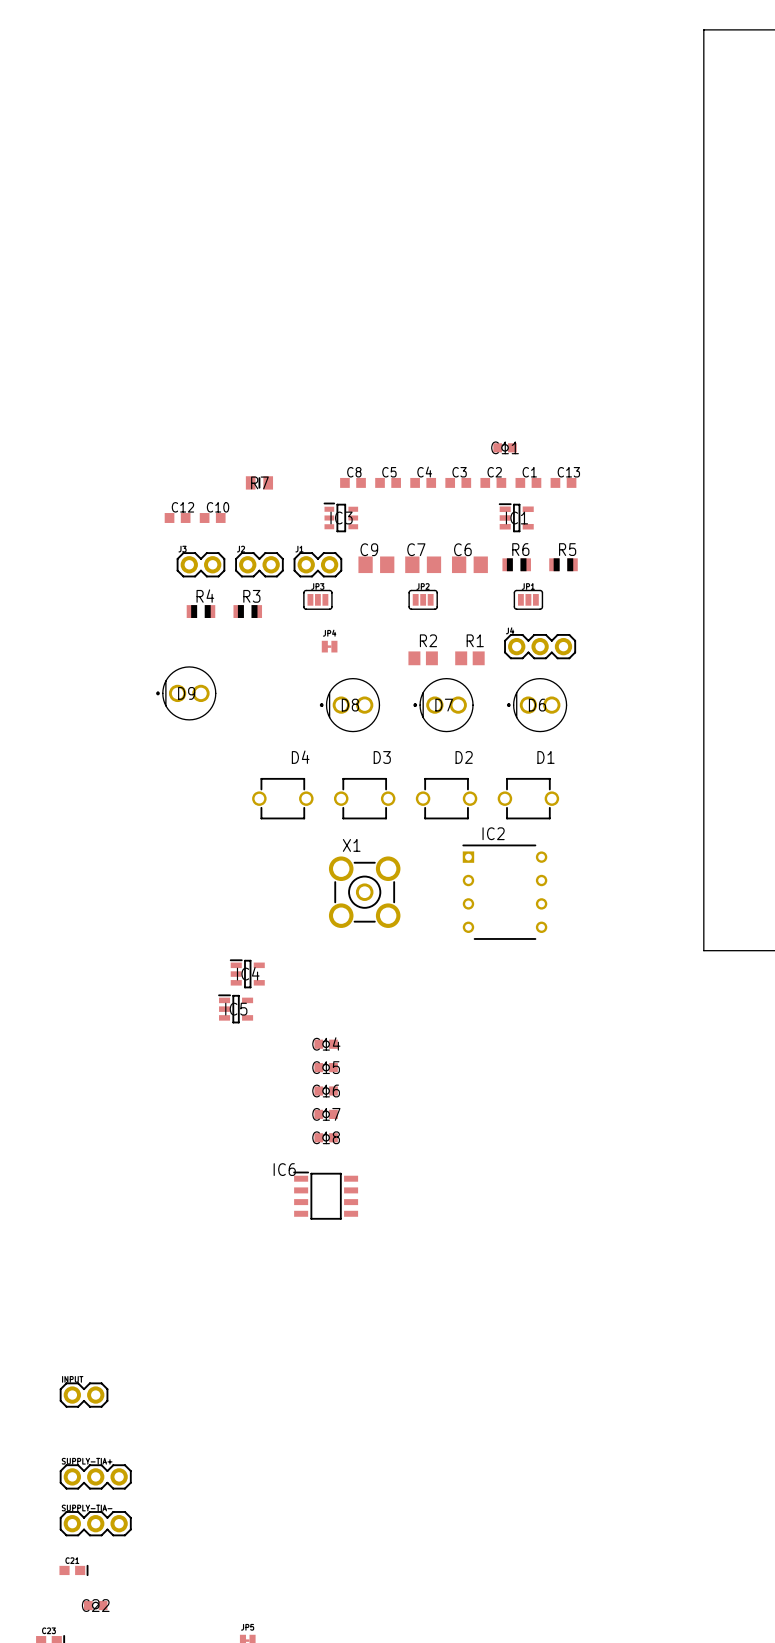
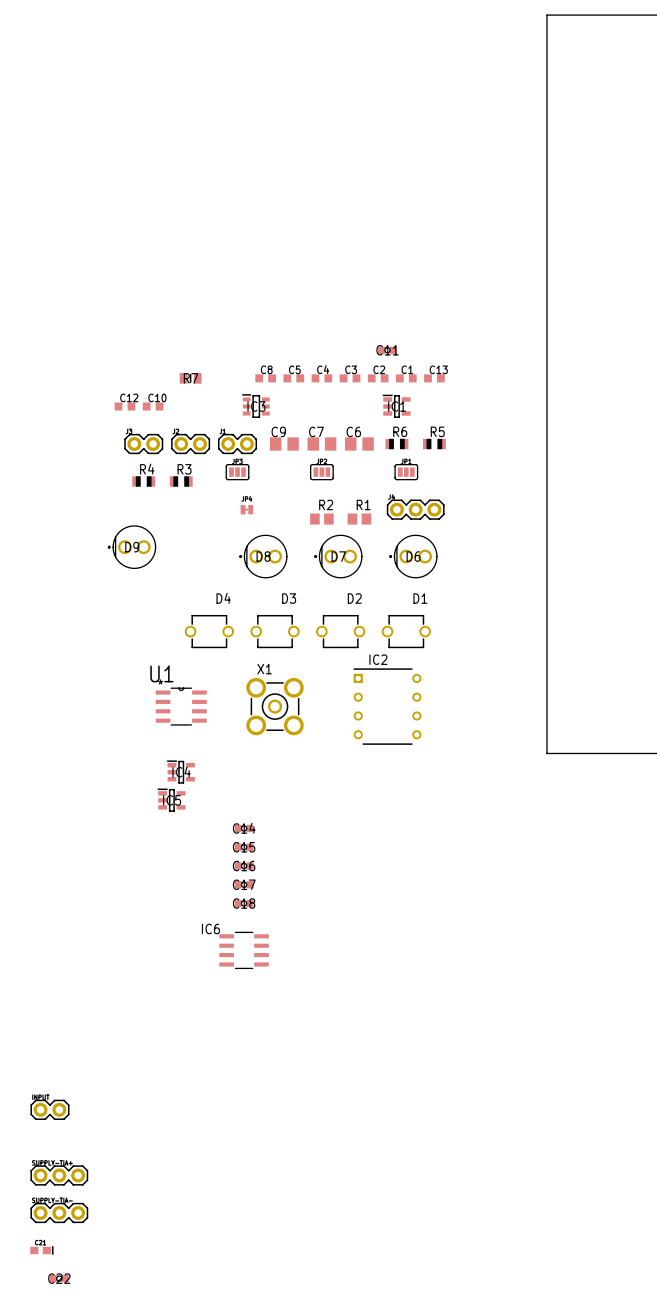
U1: none -> (181, 706)
IC6 footprint: [293, 1171, 359, 1220] -> [219, 931, 269, 969]

